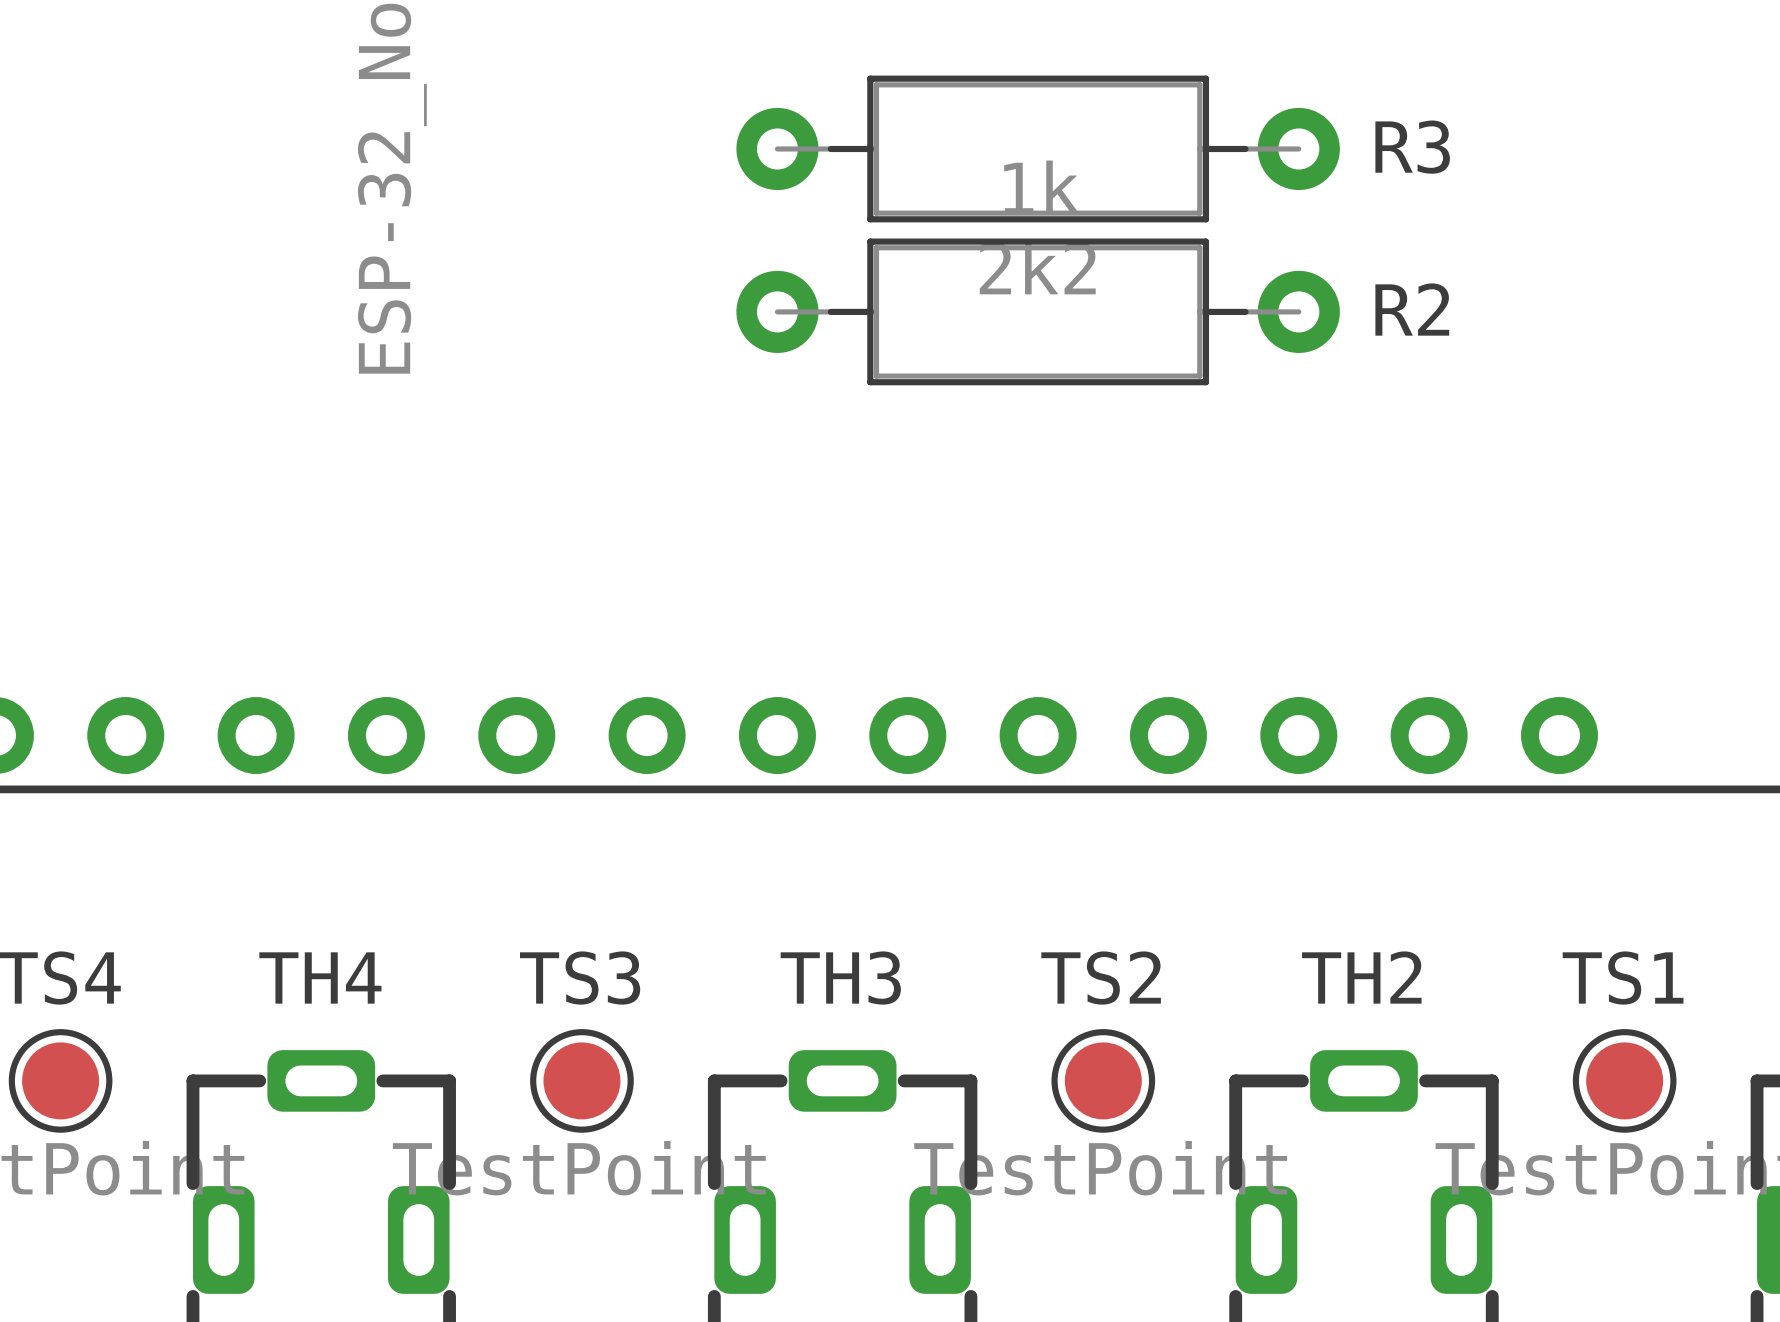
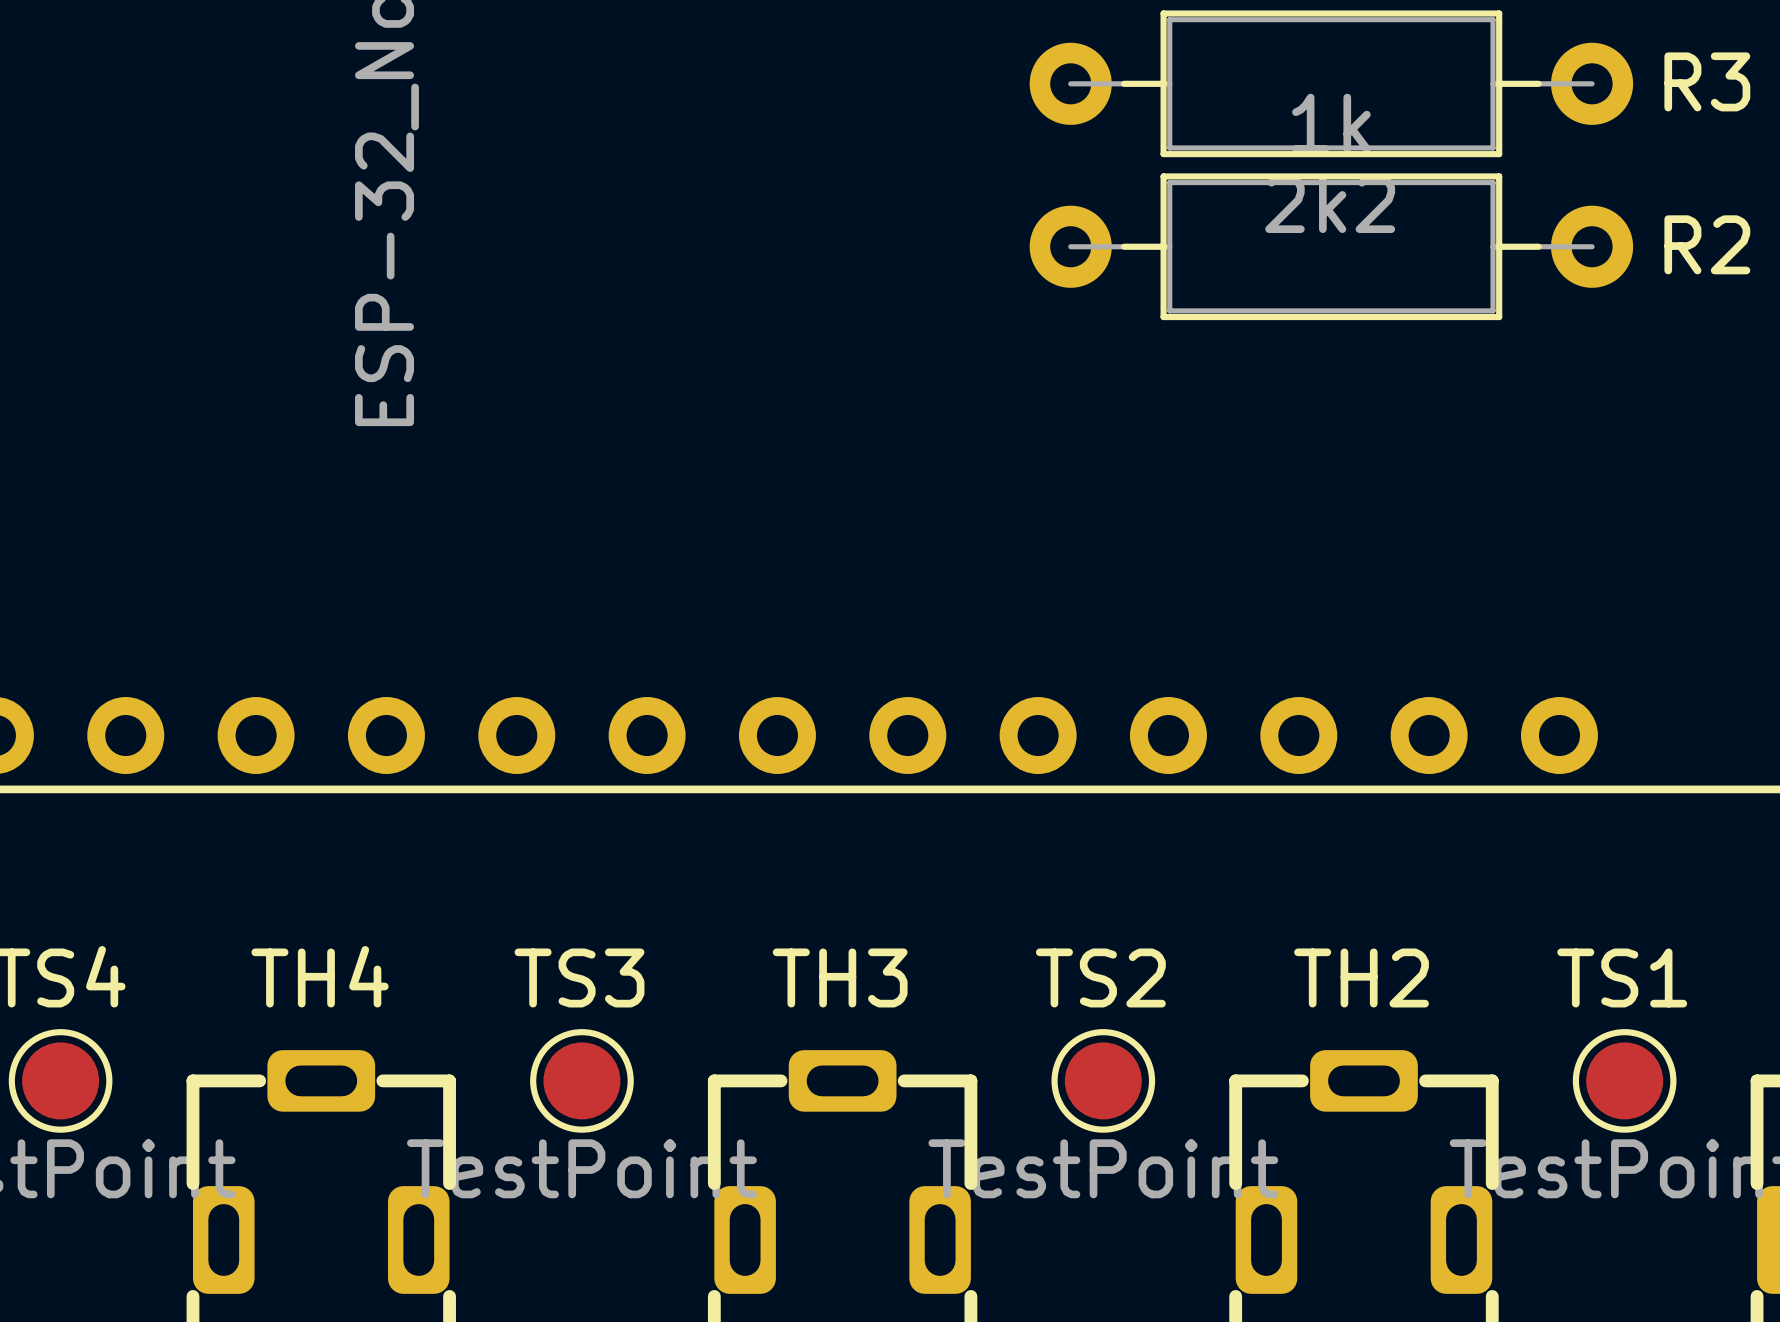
R3 position: (1038, 148) -> (1331, 83)
R2 position: (1038, 311) -> (1331, 246)

